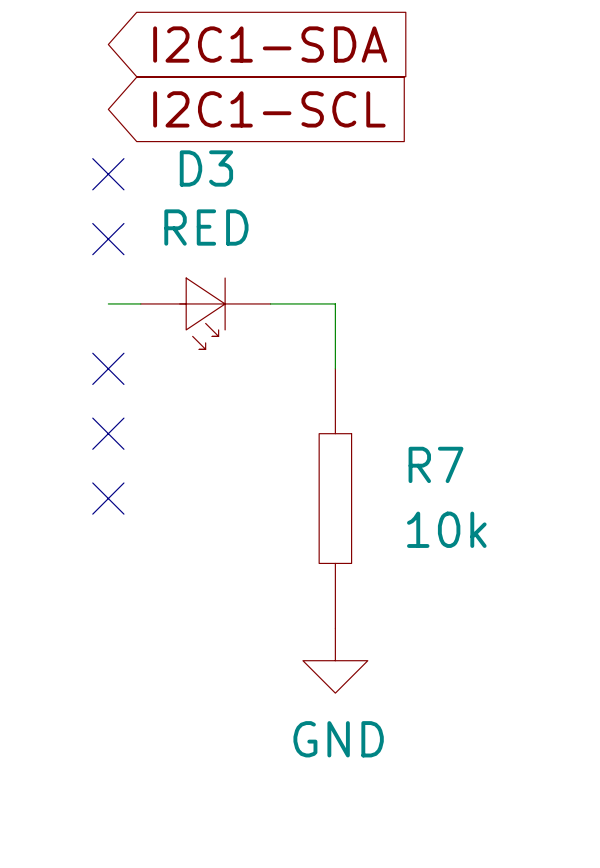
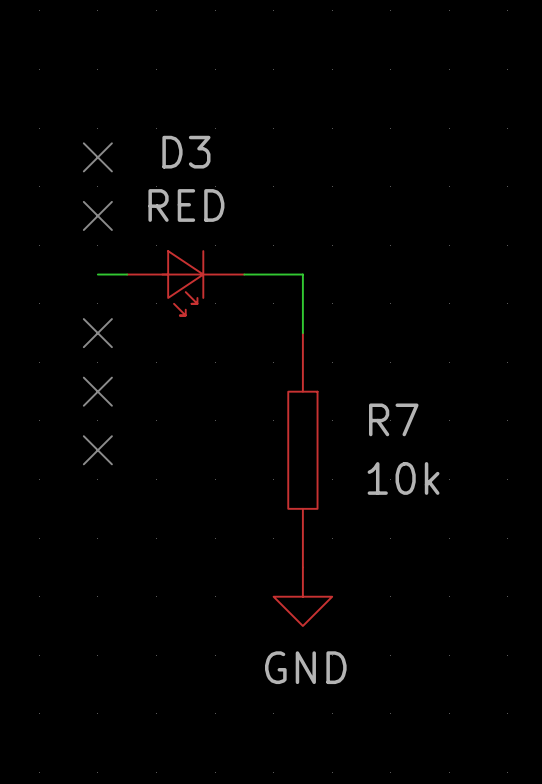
global label: I2C1-SDA (270, 44) -> none
global label: I2C1-SCL (269, 109) -> none

